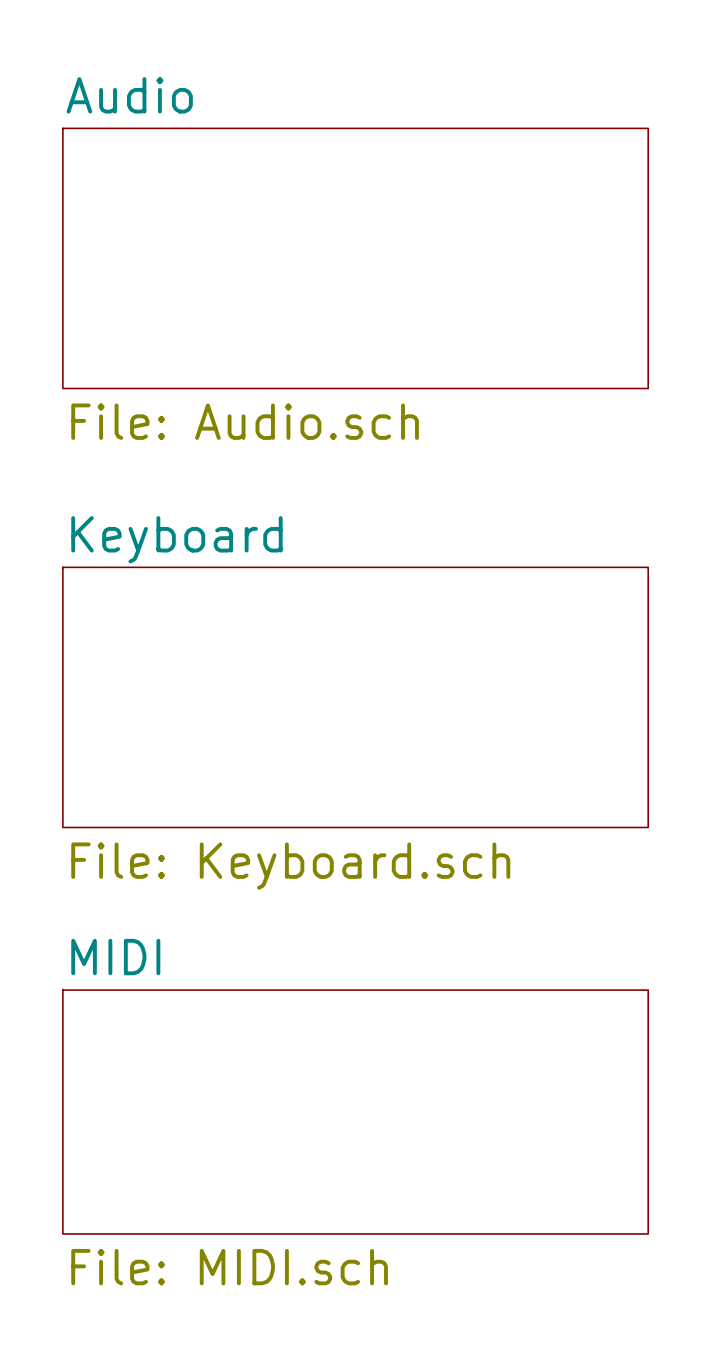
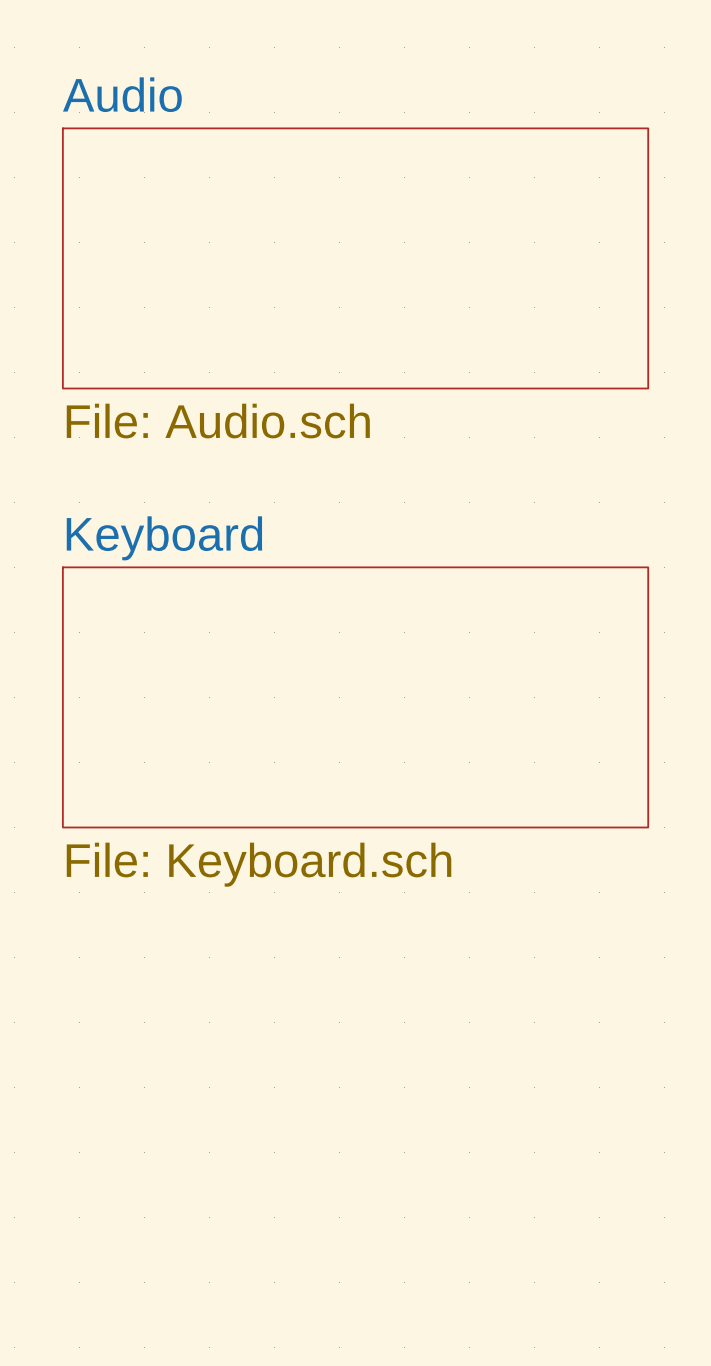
sheet MIDI: File: MIDI.sch (355, 1112) -> none

